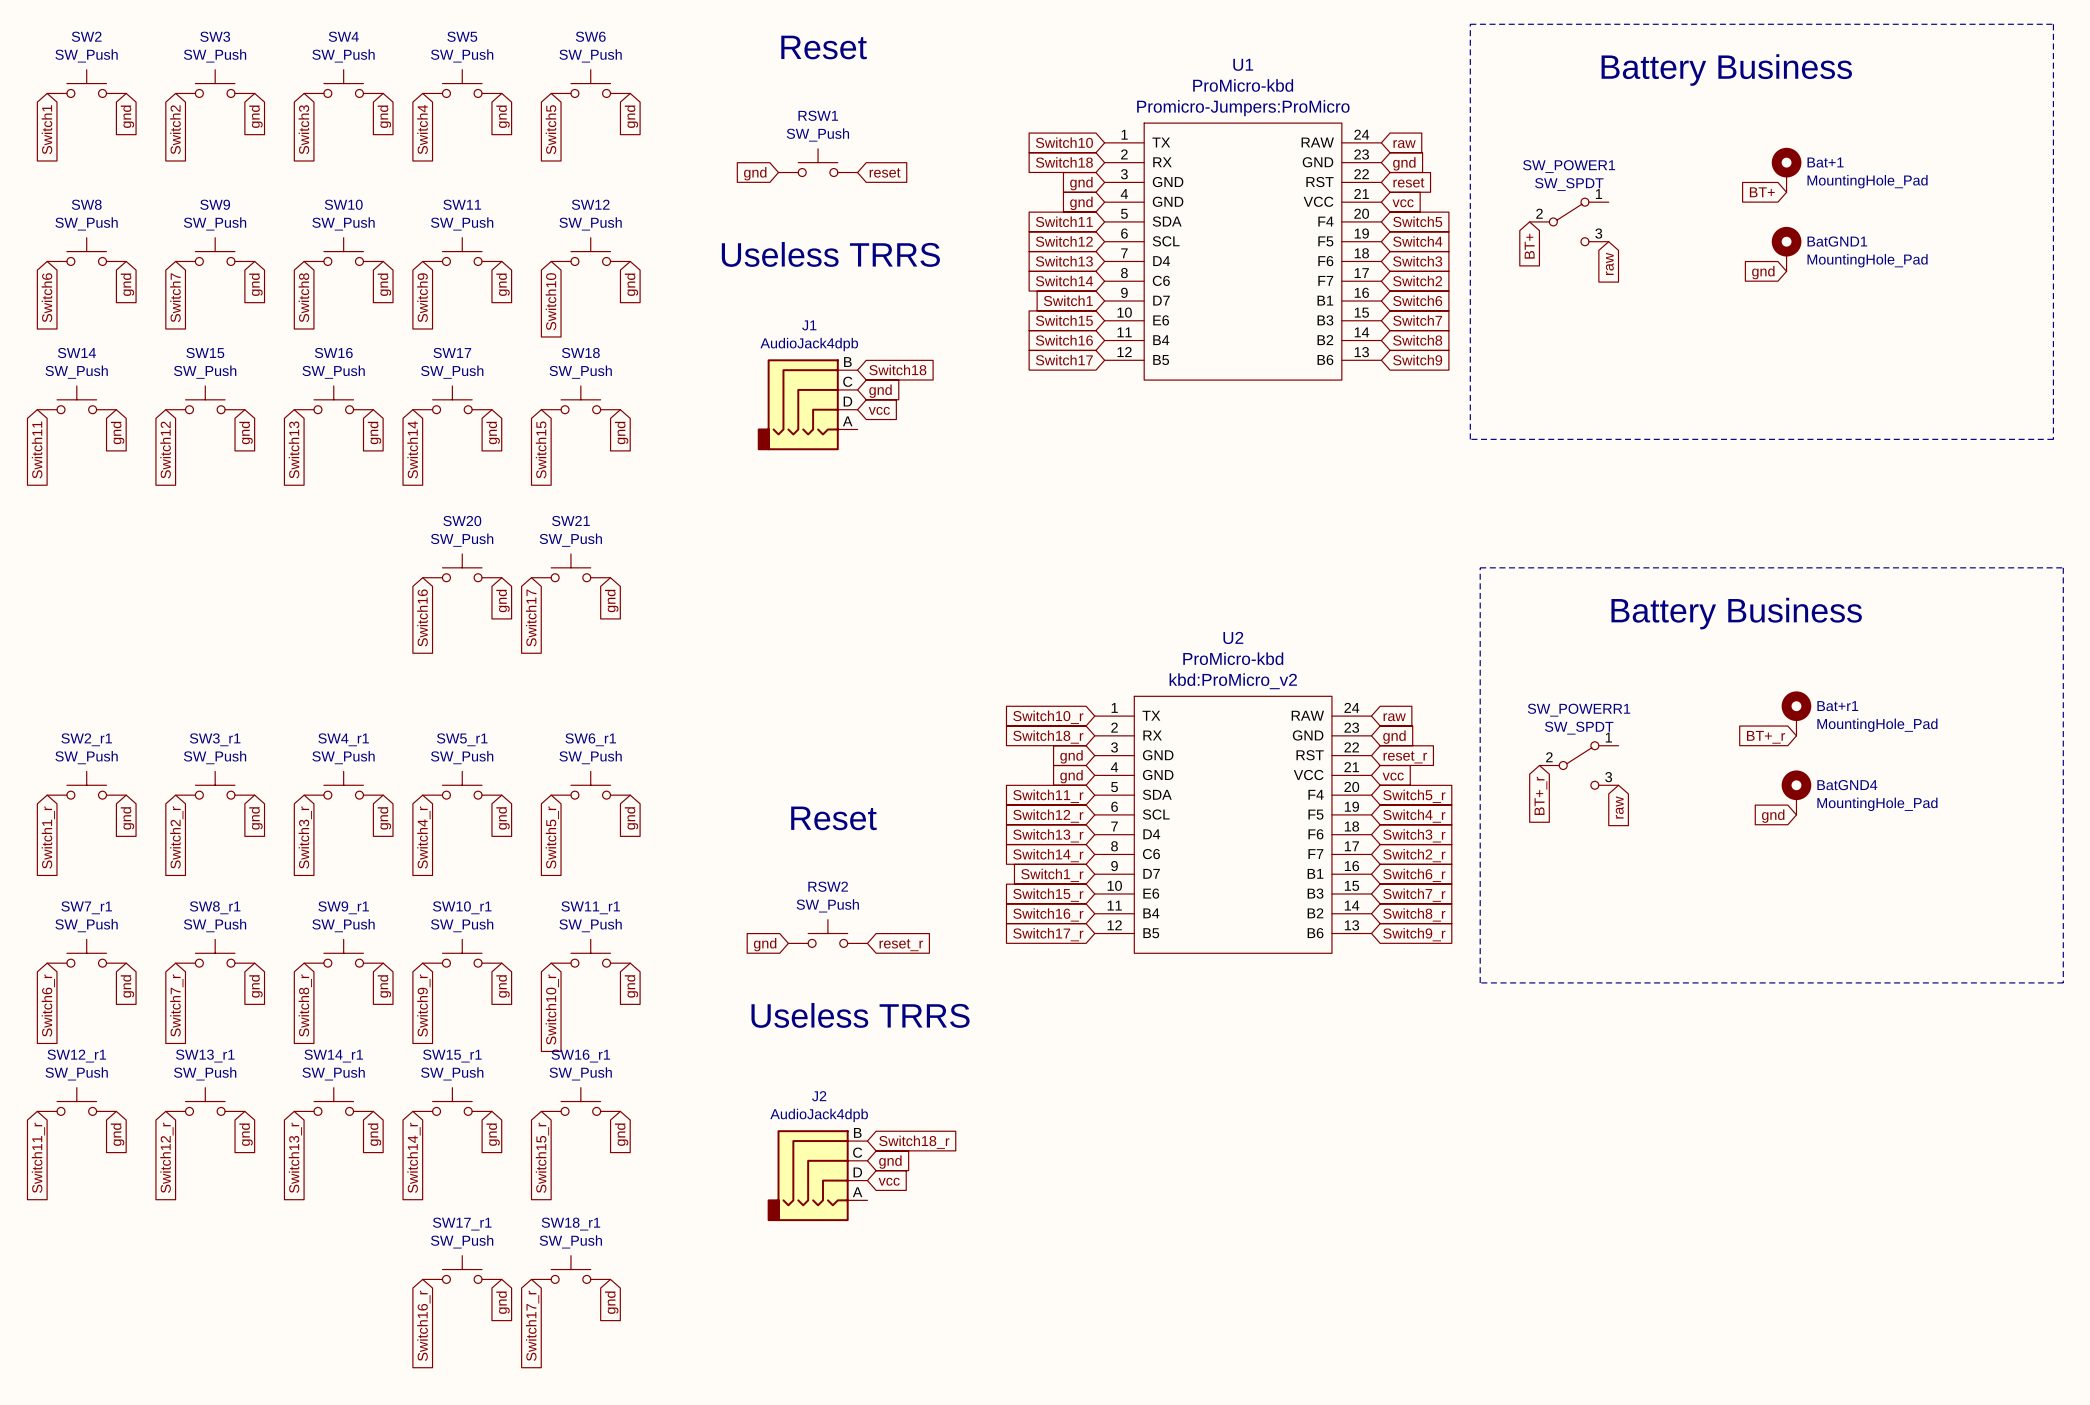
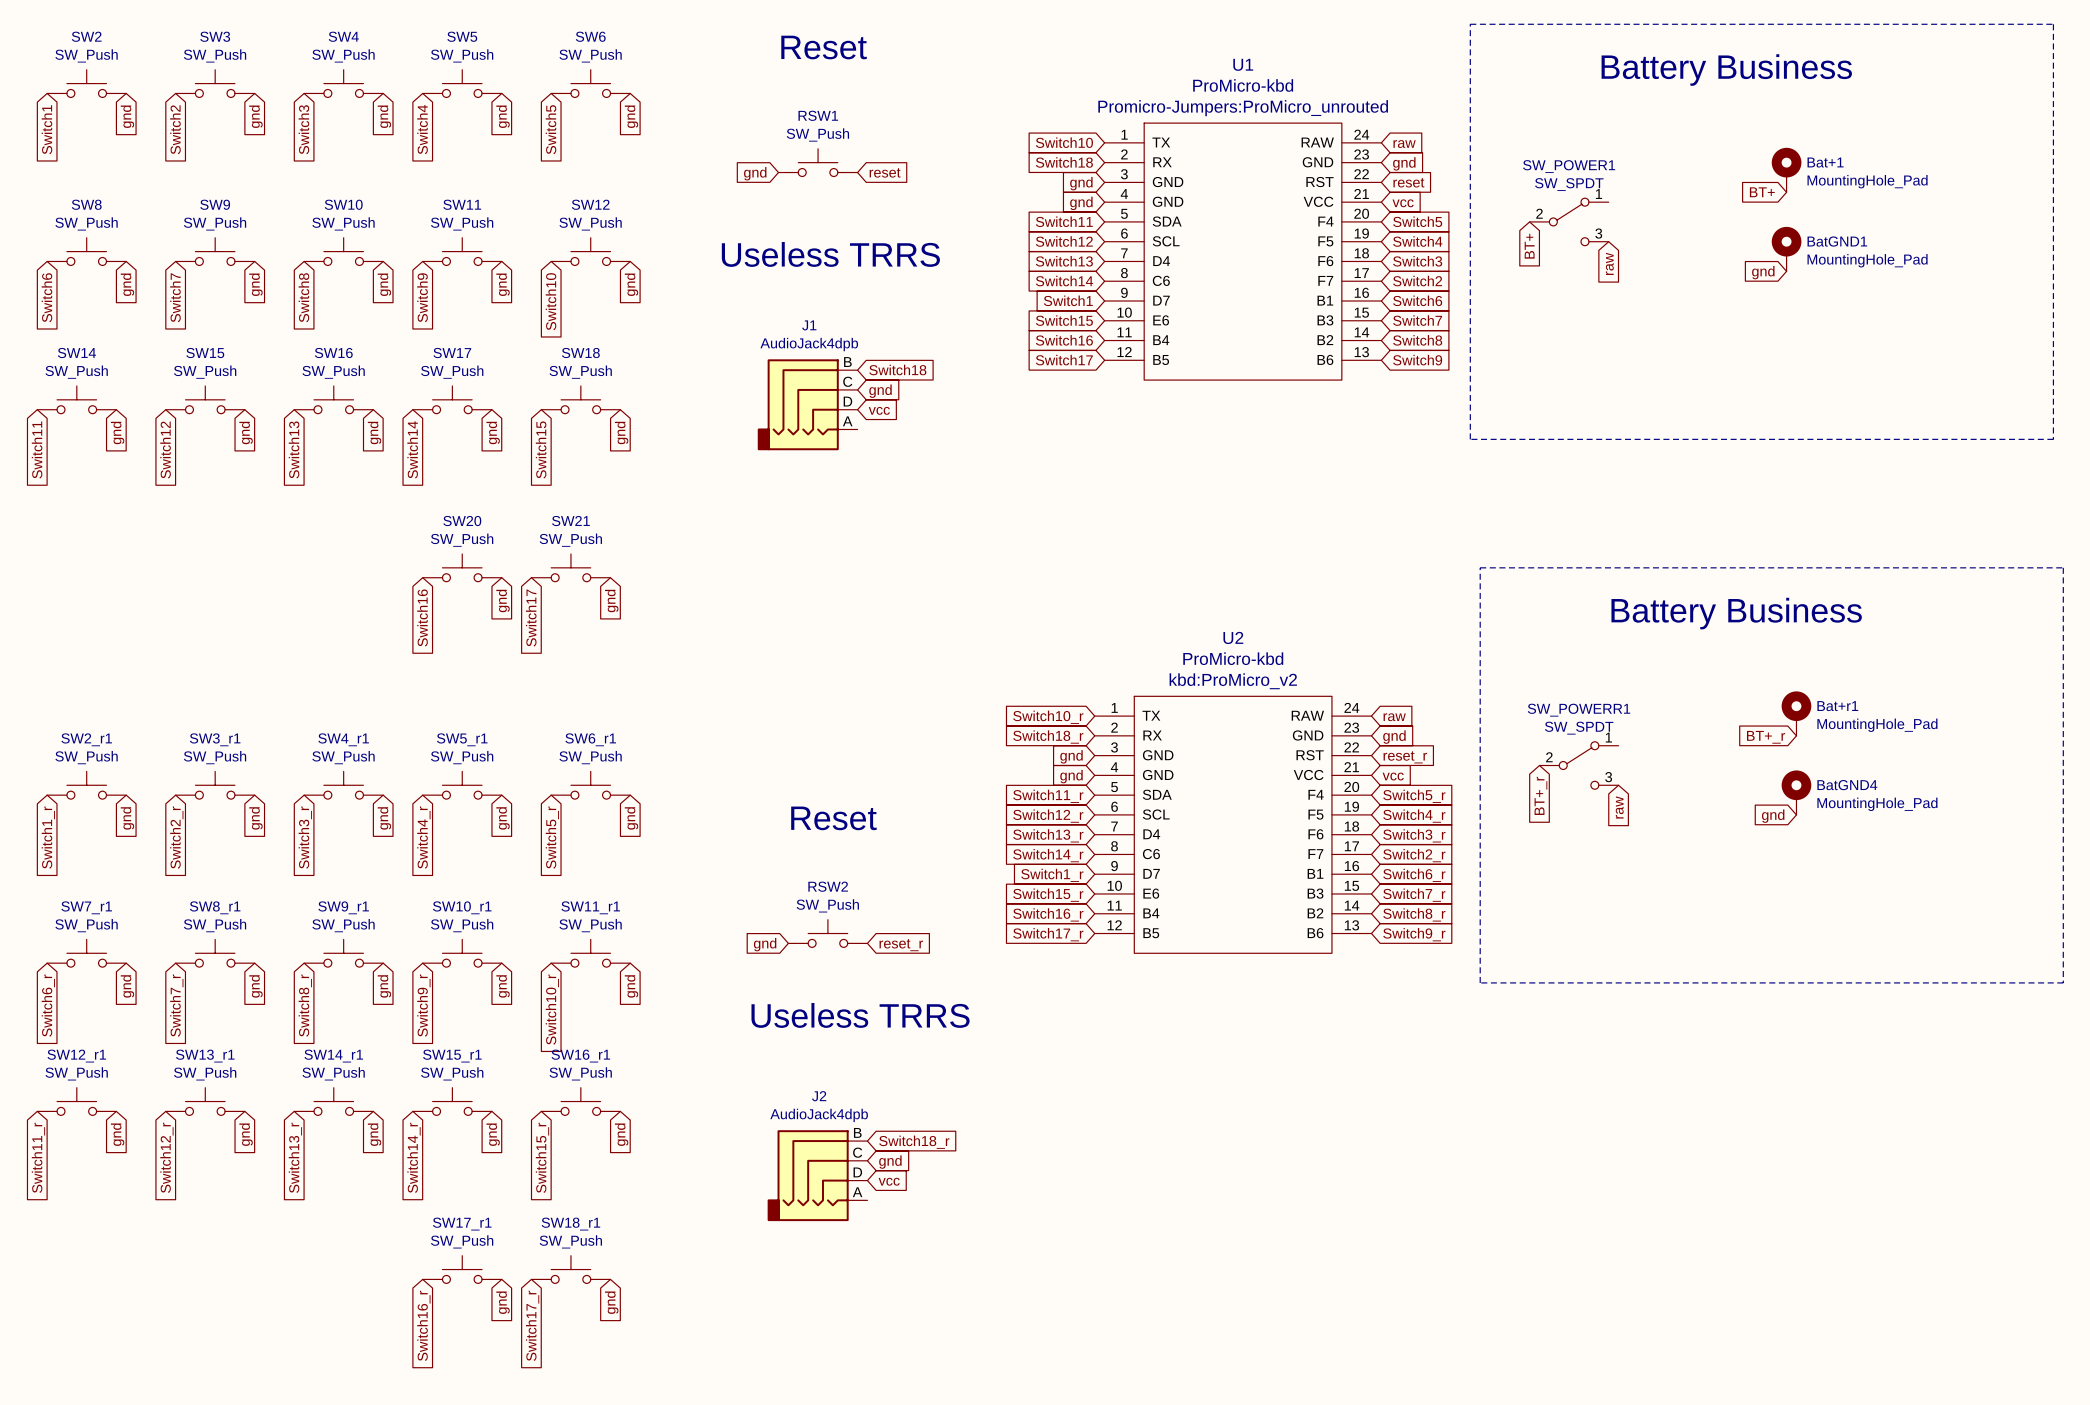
U1 text: Promicro-Jumpers:ProMicro (1243, 108) -> Promicro-Jumpers:ProMicro_unrouted (1243, 108)

